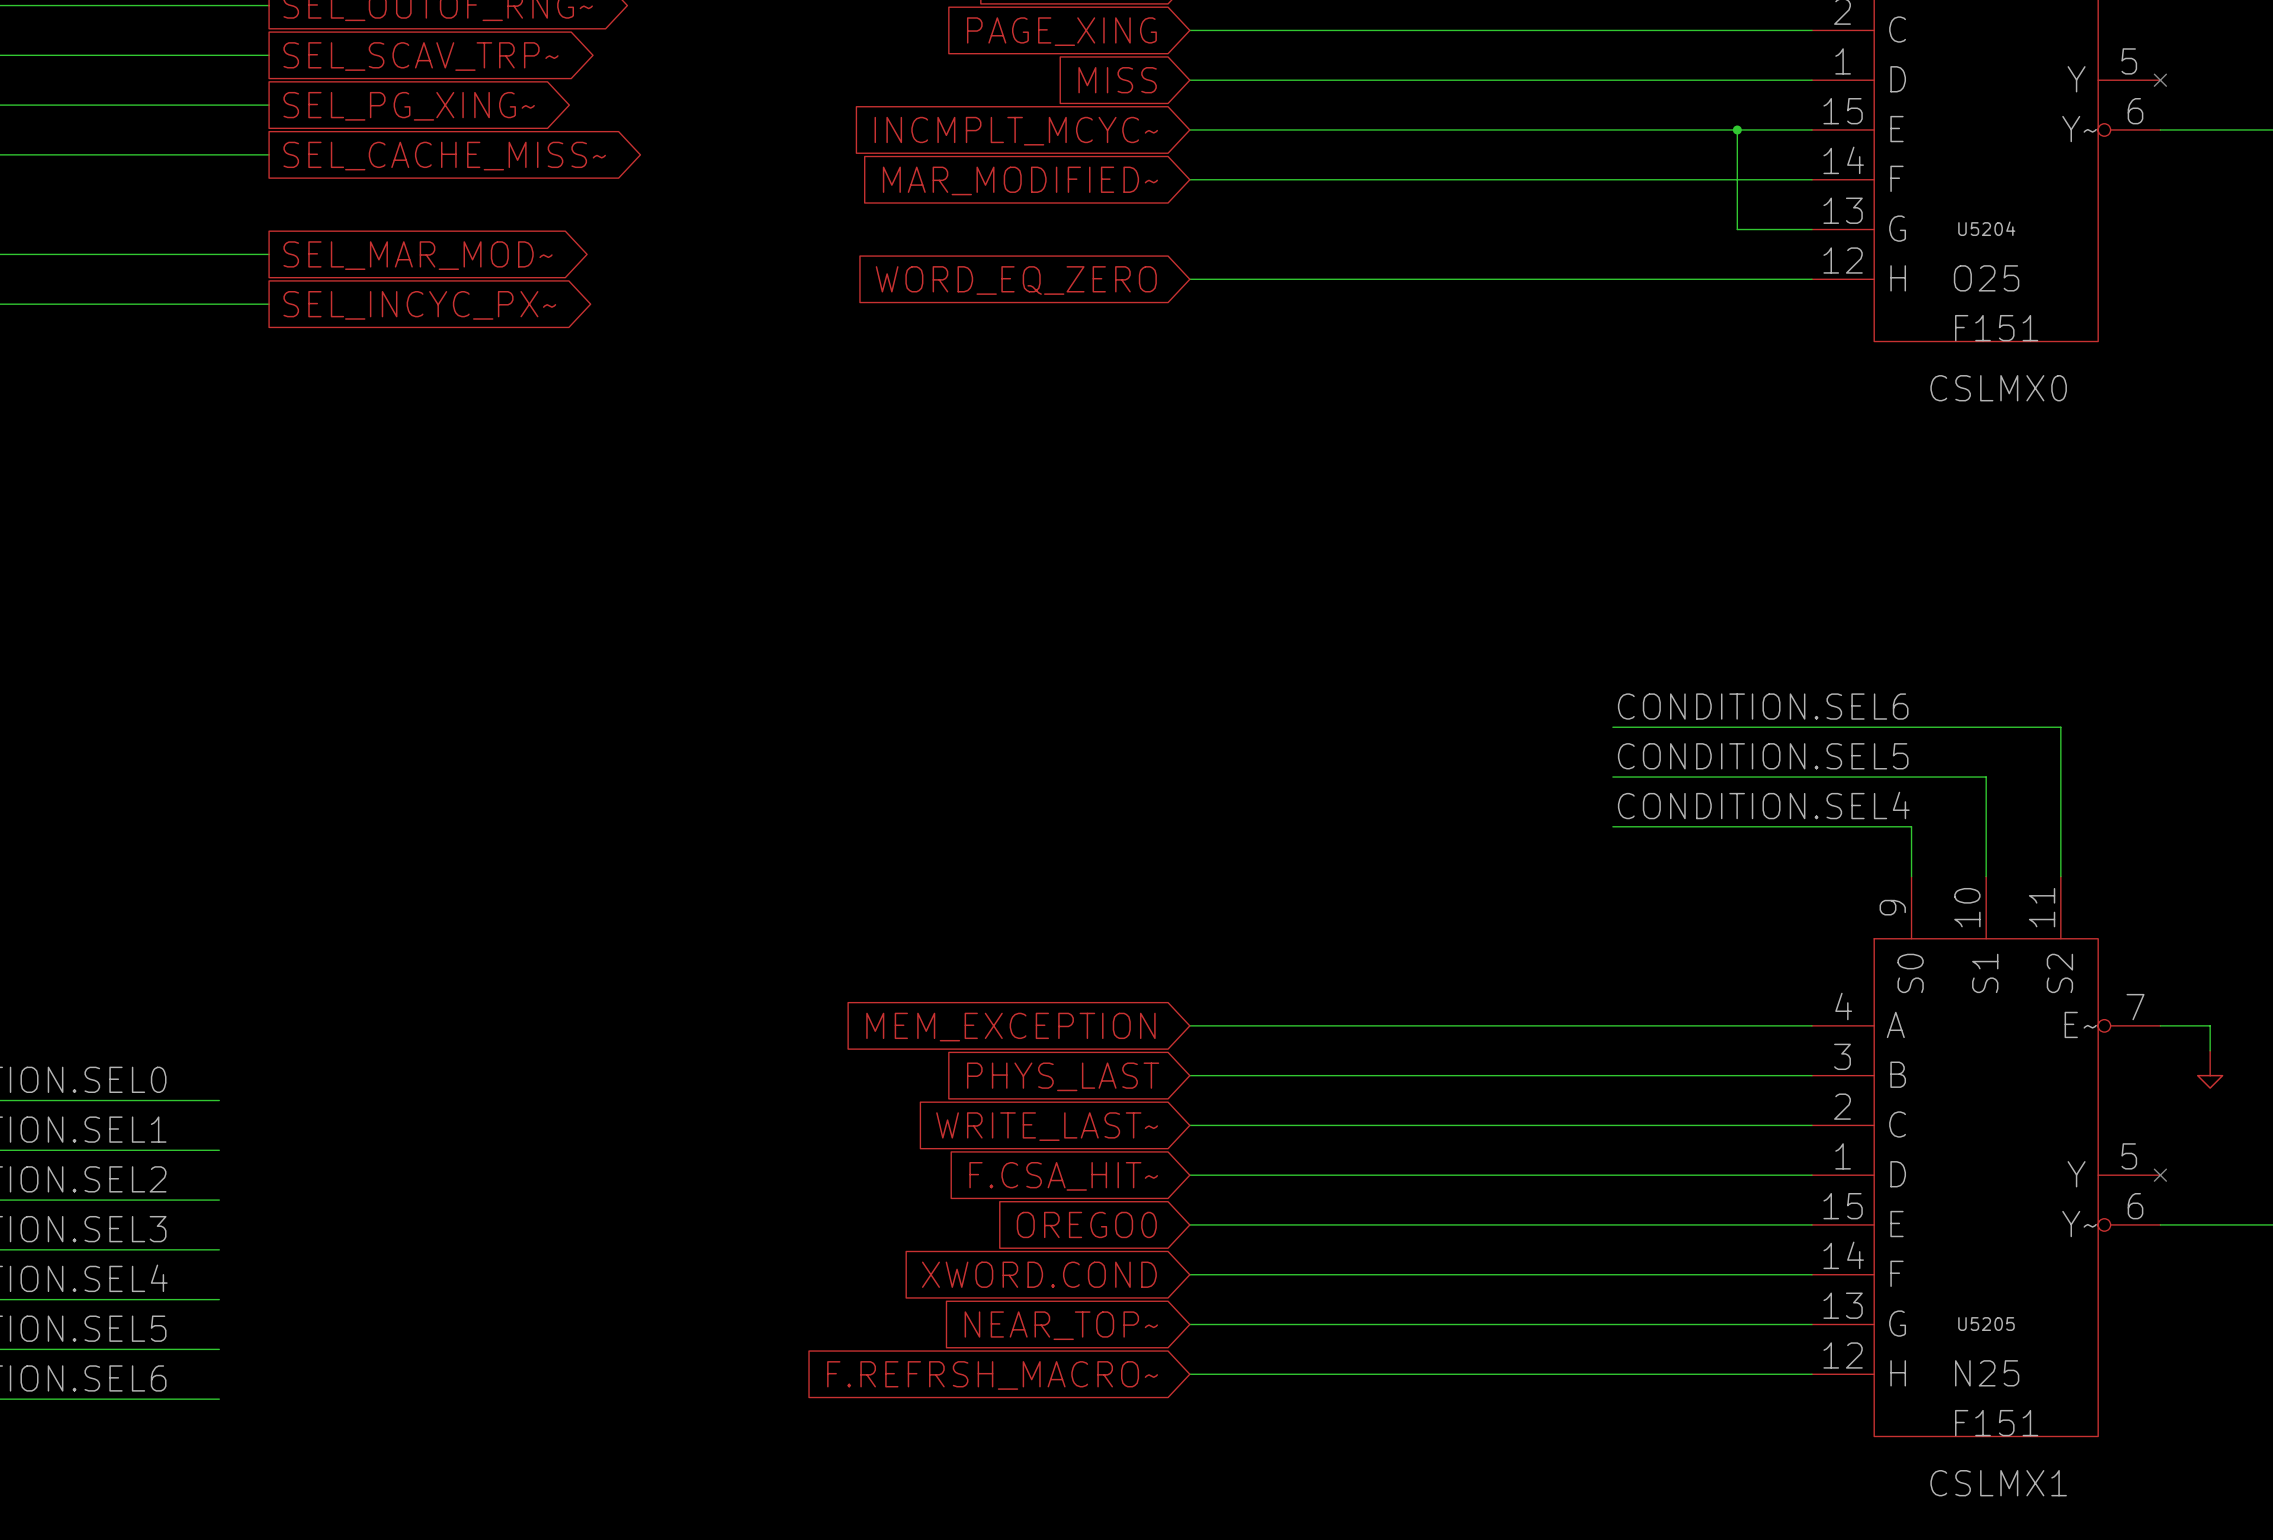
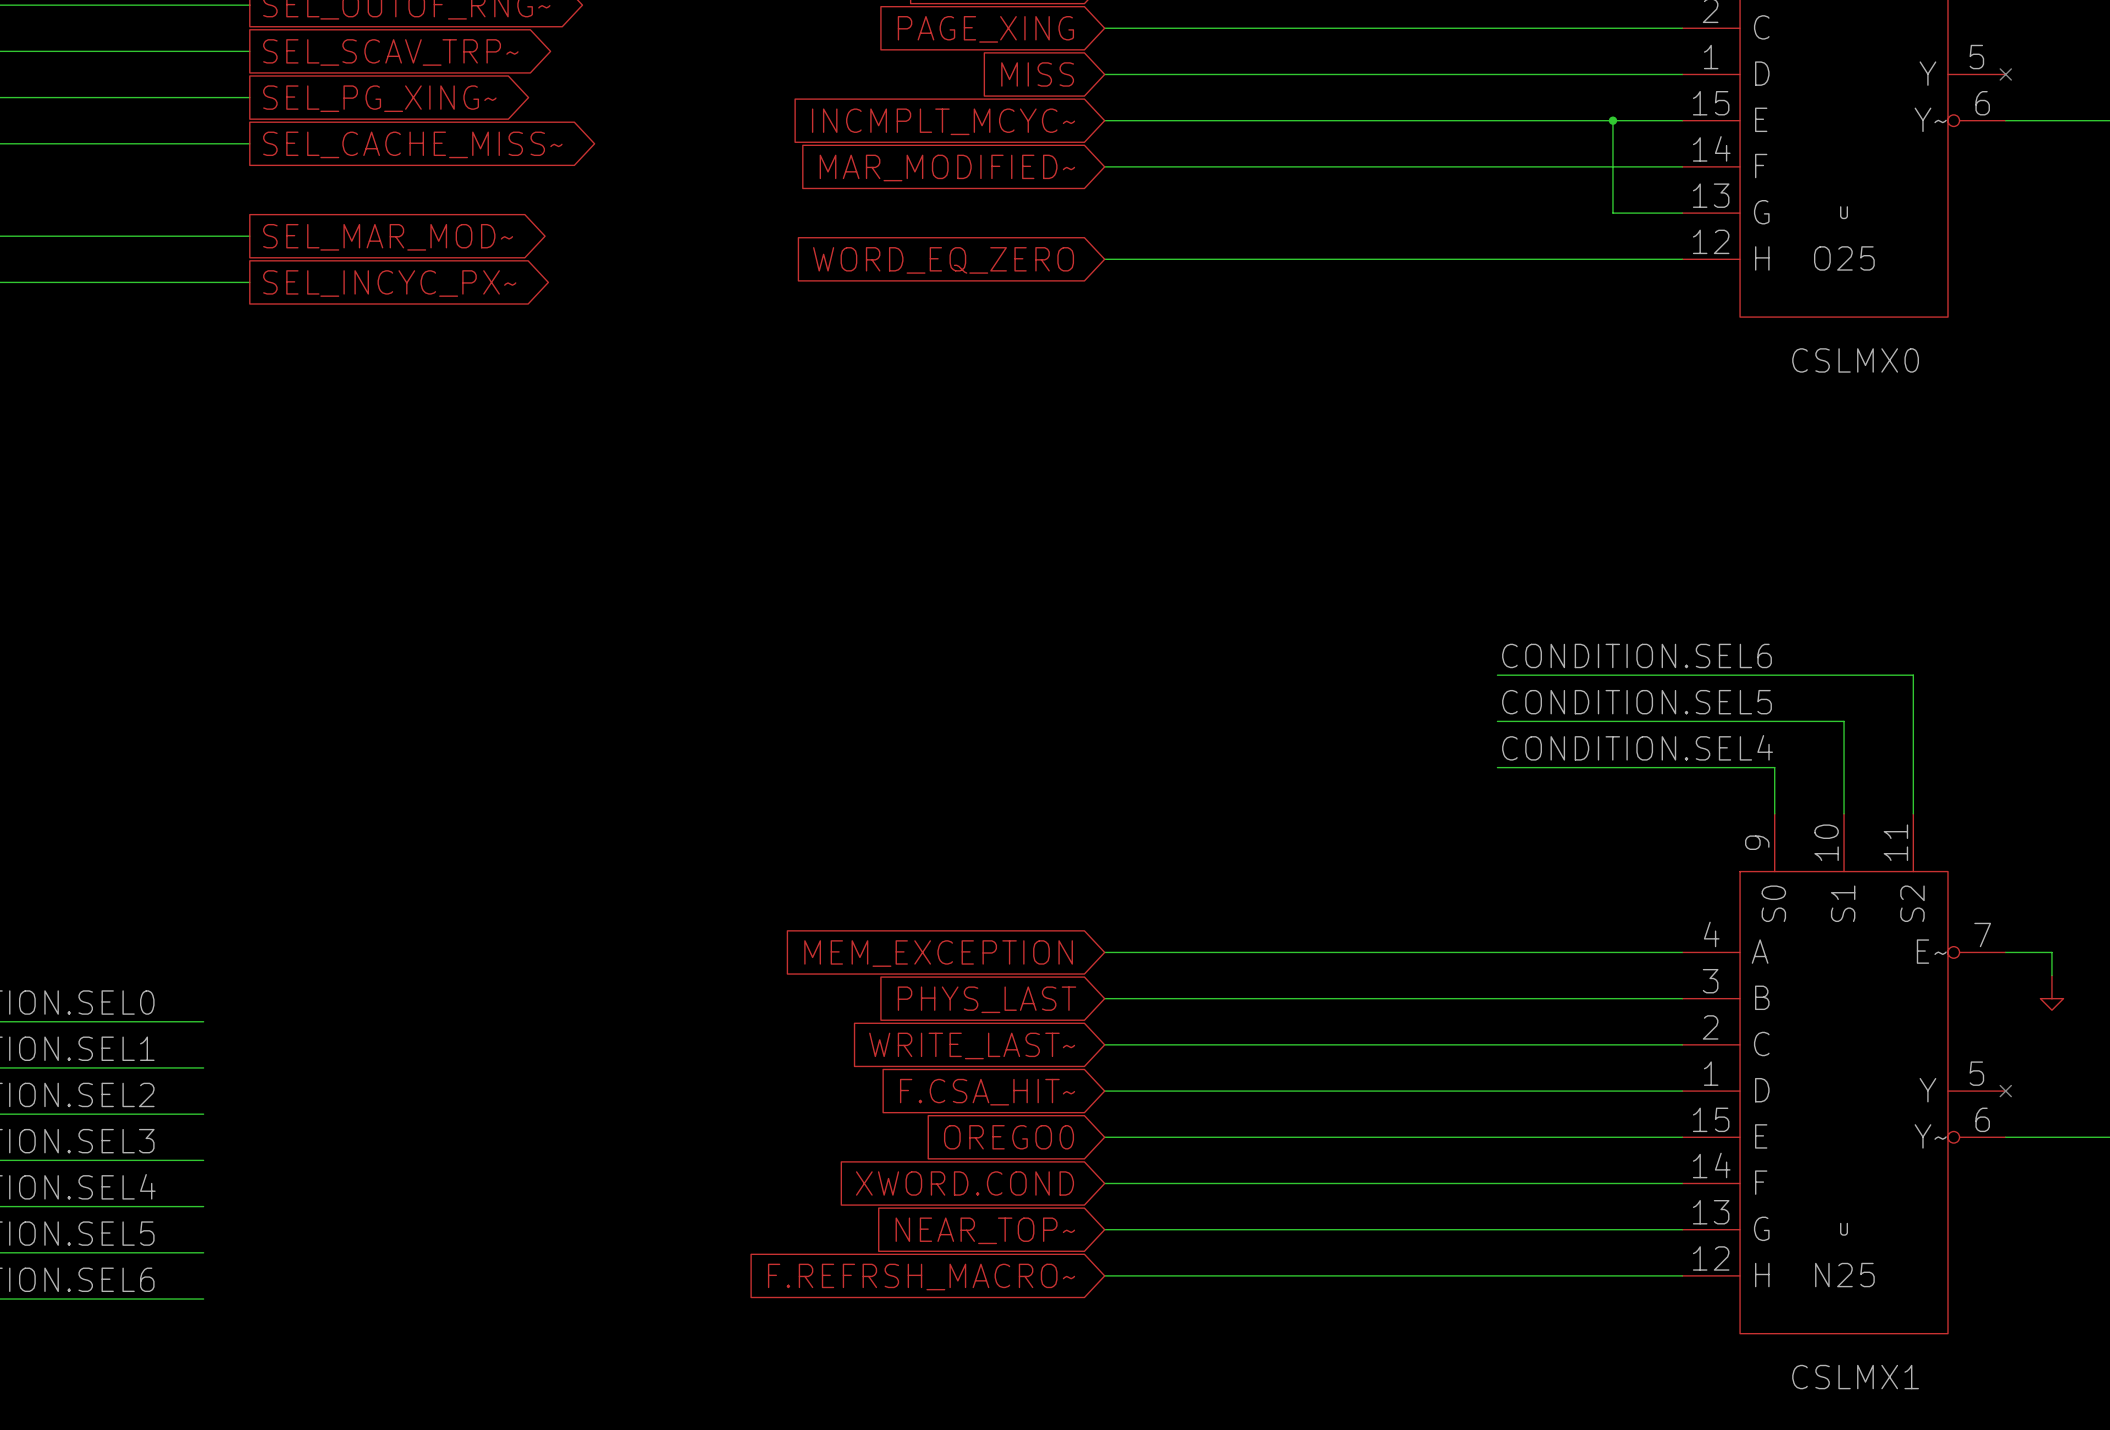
U5204 name: U5204 (1986, 228) -> U (1844, 212)
U5204 value: F151 (1996, 328) -> none
U5205 name: U5205 (1986, 1324) -> U (1844, 1229)
U5205 value: F151 (1996, 1423) -> none

